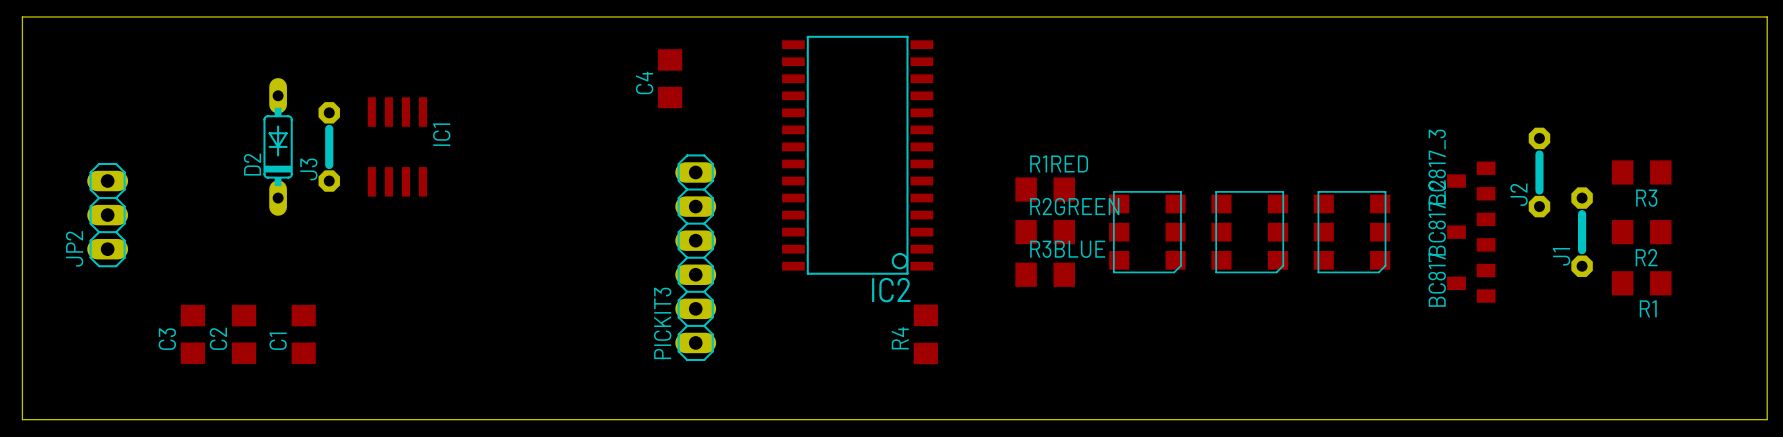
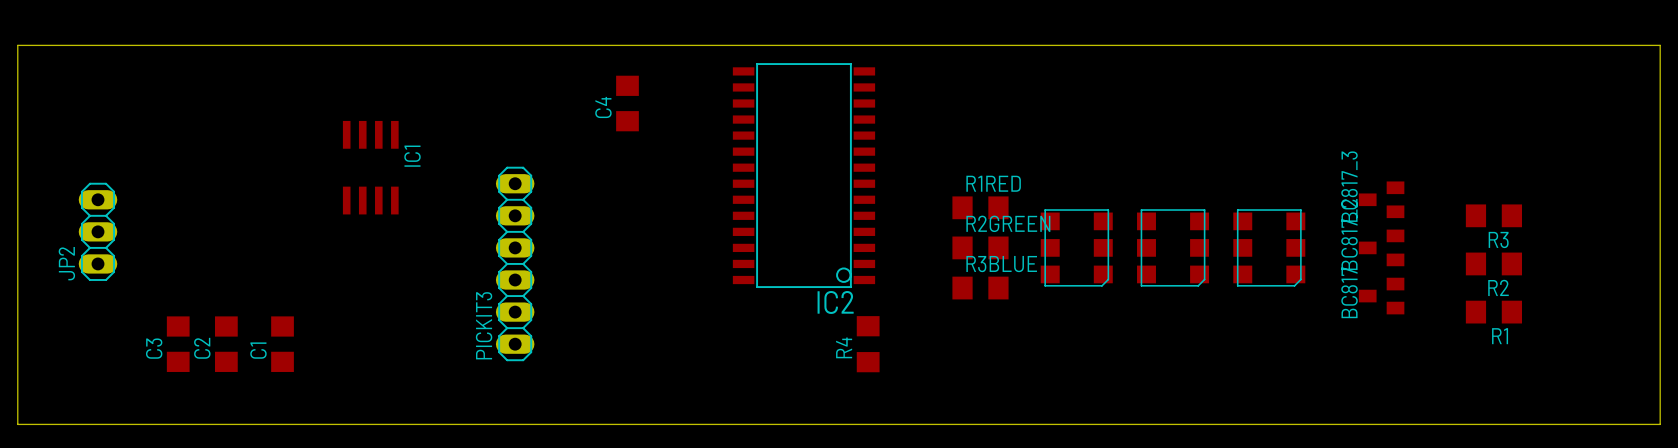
D2: (278, 146) -> none
J3: (329, 146) -> none
J2: (1539, 172) -> none
R3 position: (1641, 172) -> (1493, 215)
J1: (1582, 232) -> none
R2 position: (1641, 232) -> (1493, 263)
PICKIT3 position: (695, 257) -> (515, 263)
R1 position: (1641, 283) -> (1493, 312)

